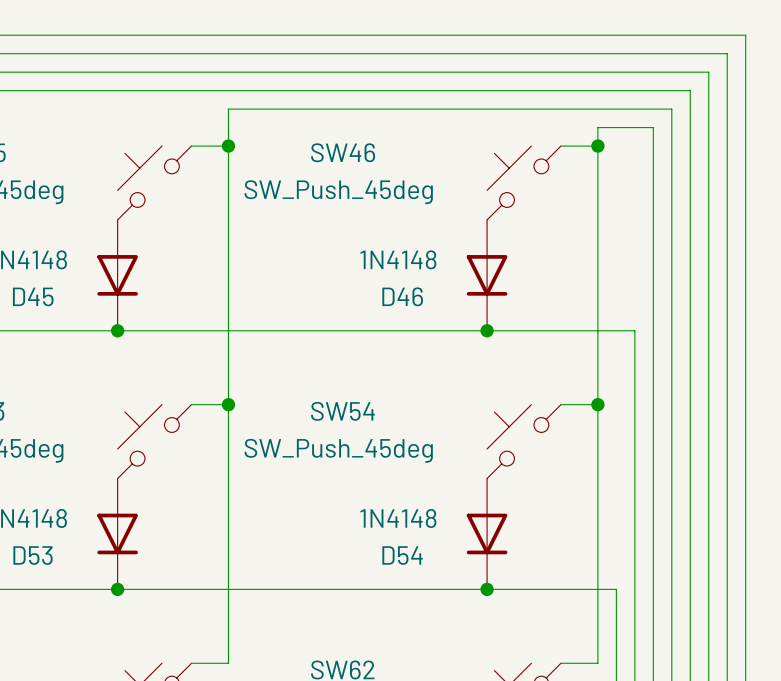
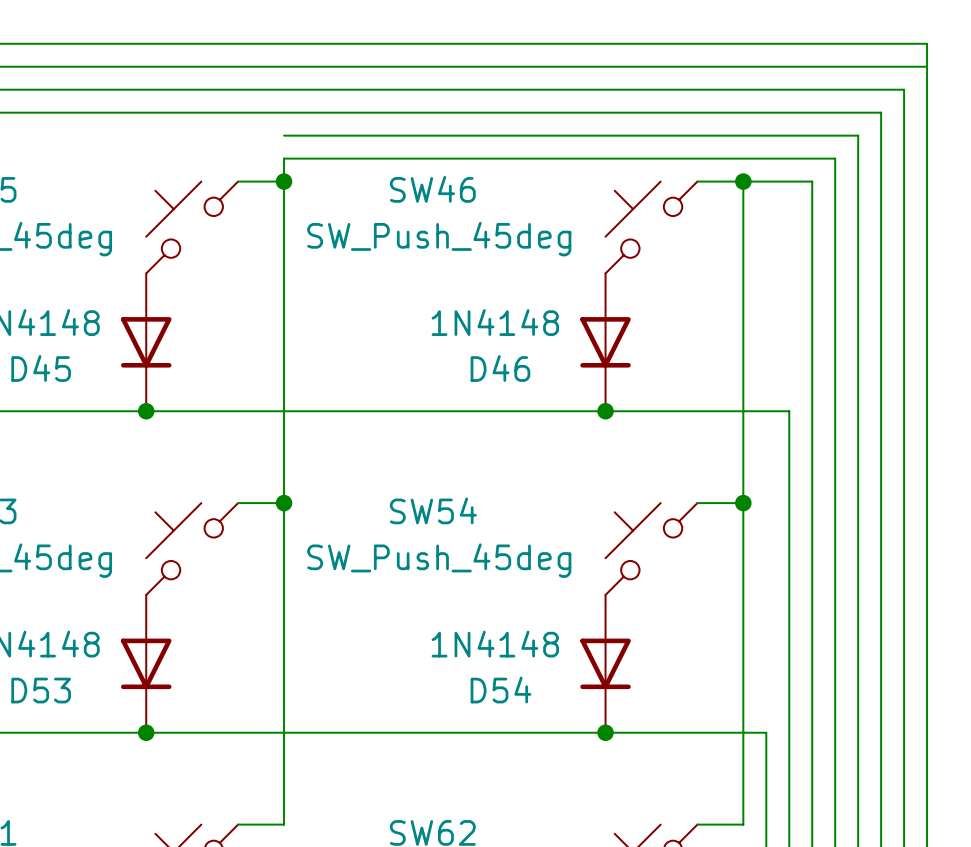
wire: (727, 53) (727, 72) -> (904, 66) (927, 66)
wire: (708, 72) (708, 90) -> (881, 89) (904, 89)
wire: (690, 90) (690, 109) -> (835, 135) (858, 135)
wire: none -> (858, 112) (881, 112)
wire: (228, 109) (228, 127) -> (743, 158) (284, 158)
wire: (671, 109) (671, 127) -> (812, 158) (835, 158)
wire: (597, 127) (597, 146) -> (812, 181) (743, 181)
wire: (653, 127) (653, 146) -> none

